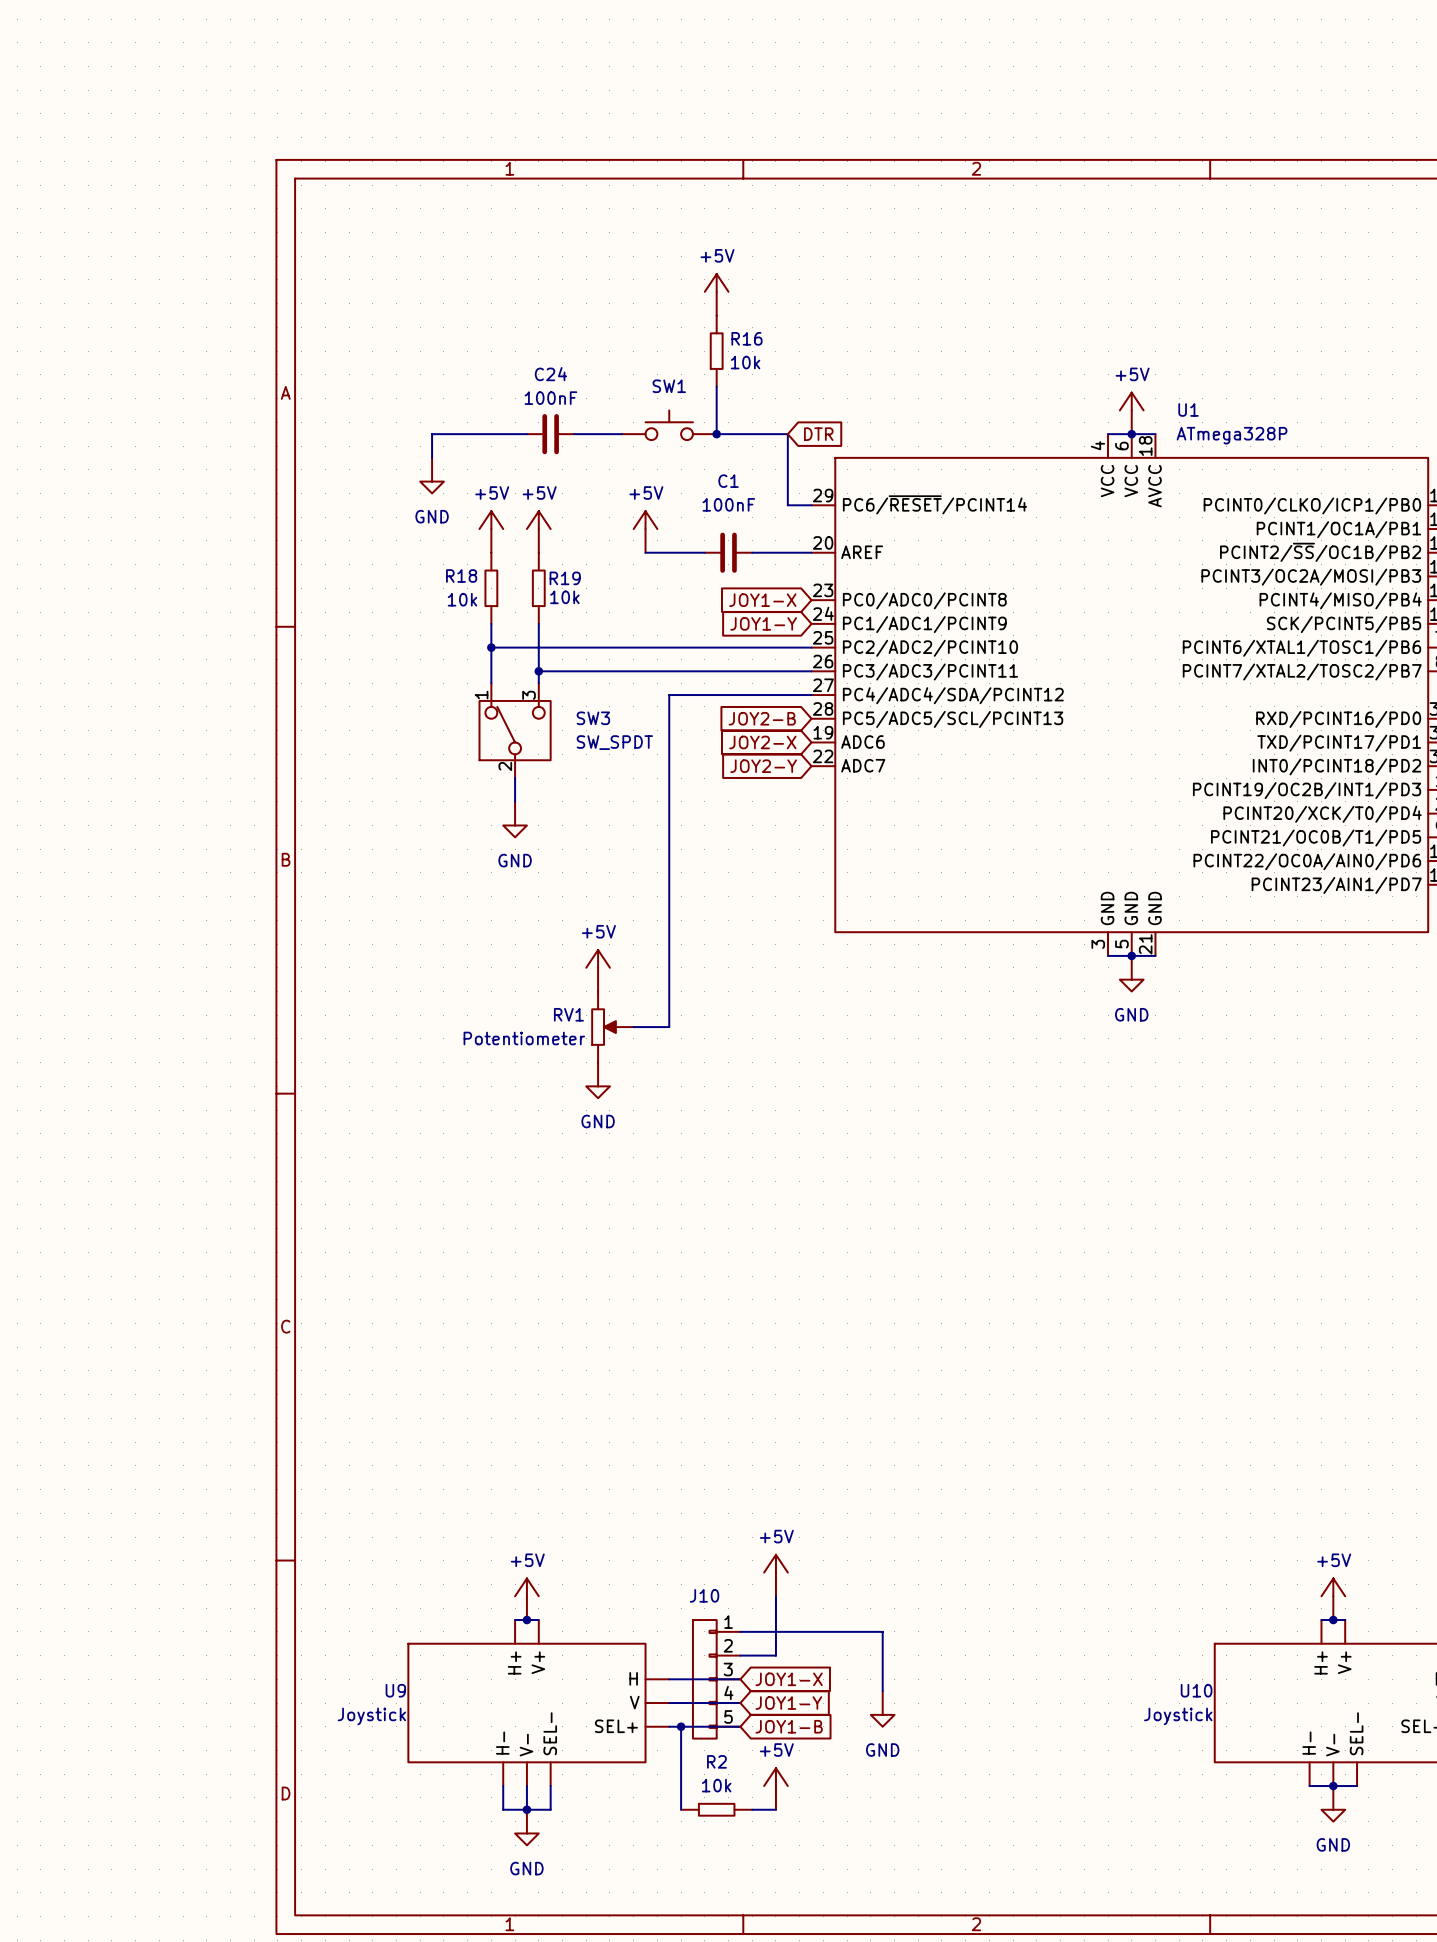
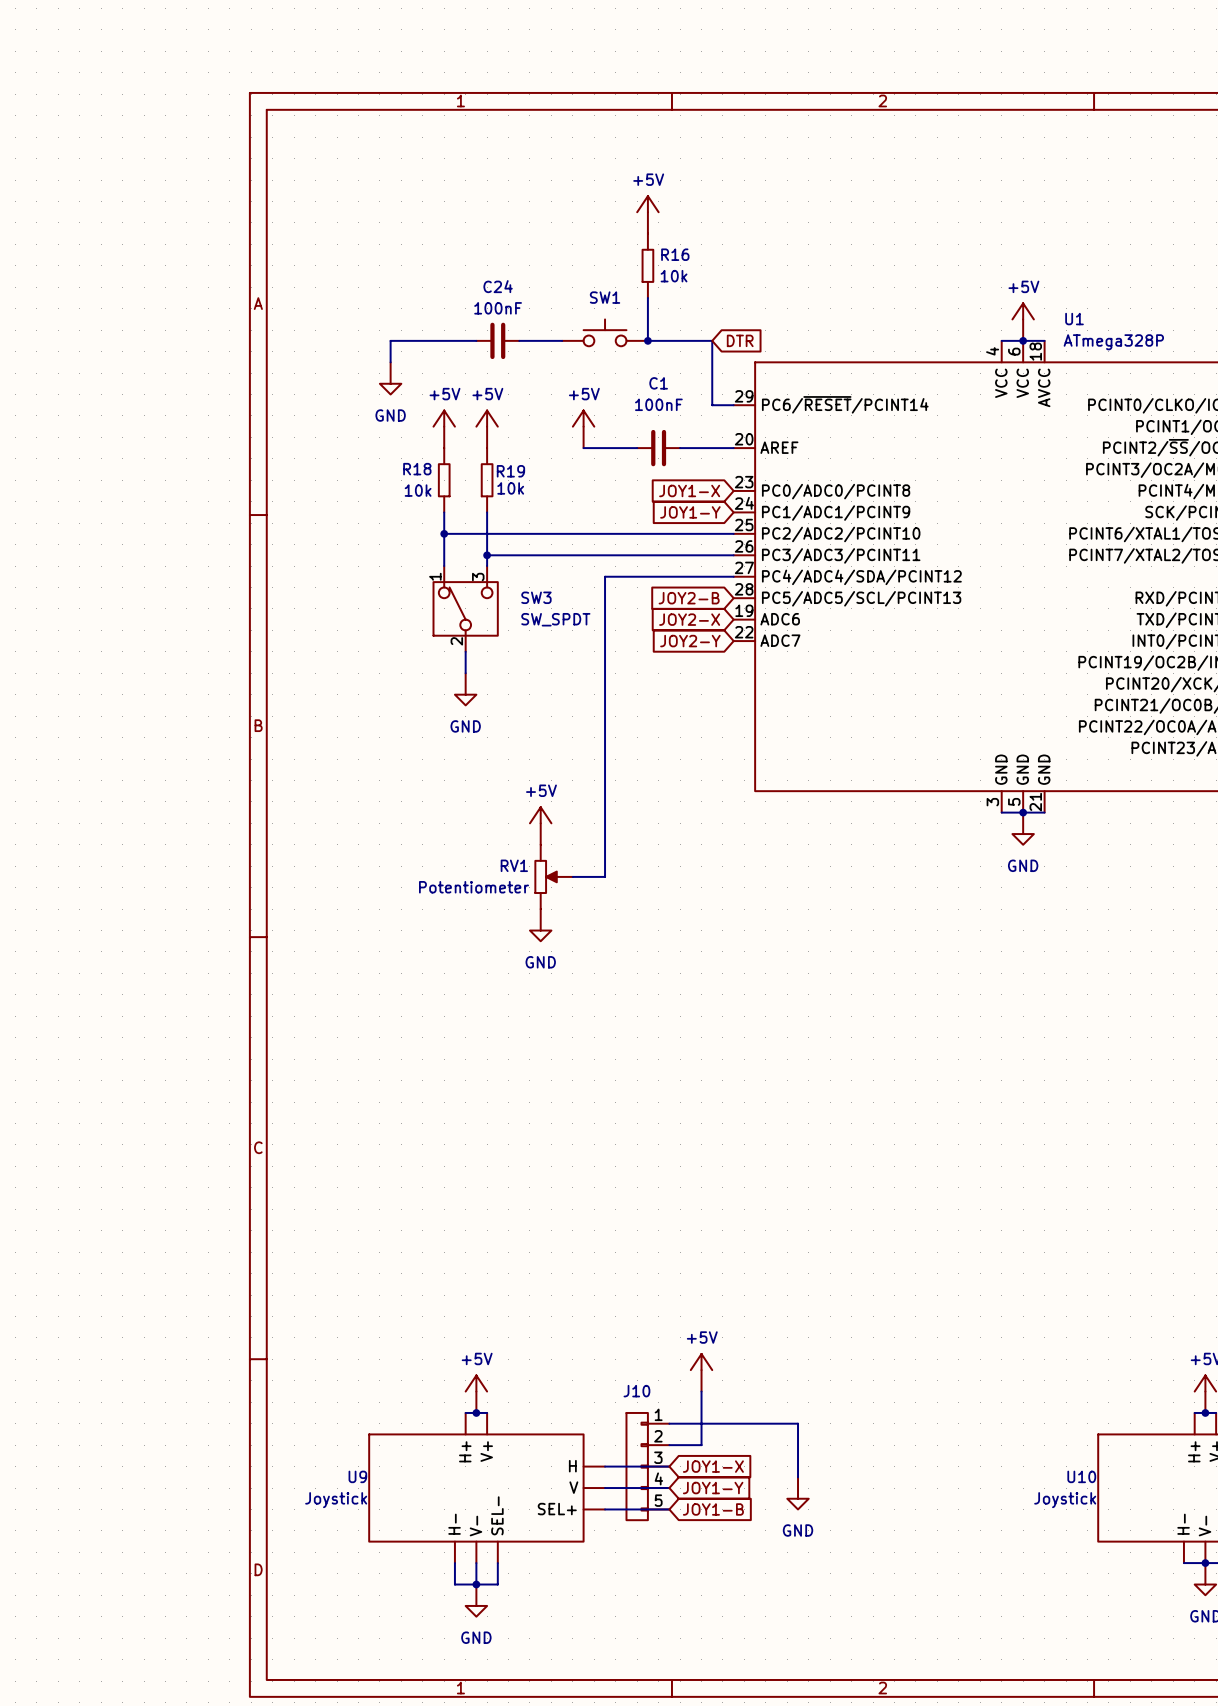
wire: (681, 1726) (681, 1809) -> none
junction: (681, 1726) -> none
power symbol: +5V (775, 1789) -> none
R2: 10k (716, 1809) -> none
wire: (752, 1809) (775, 1809) -> none

